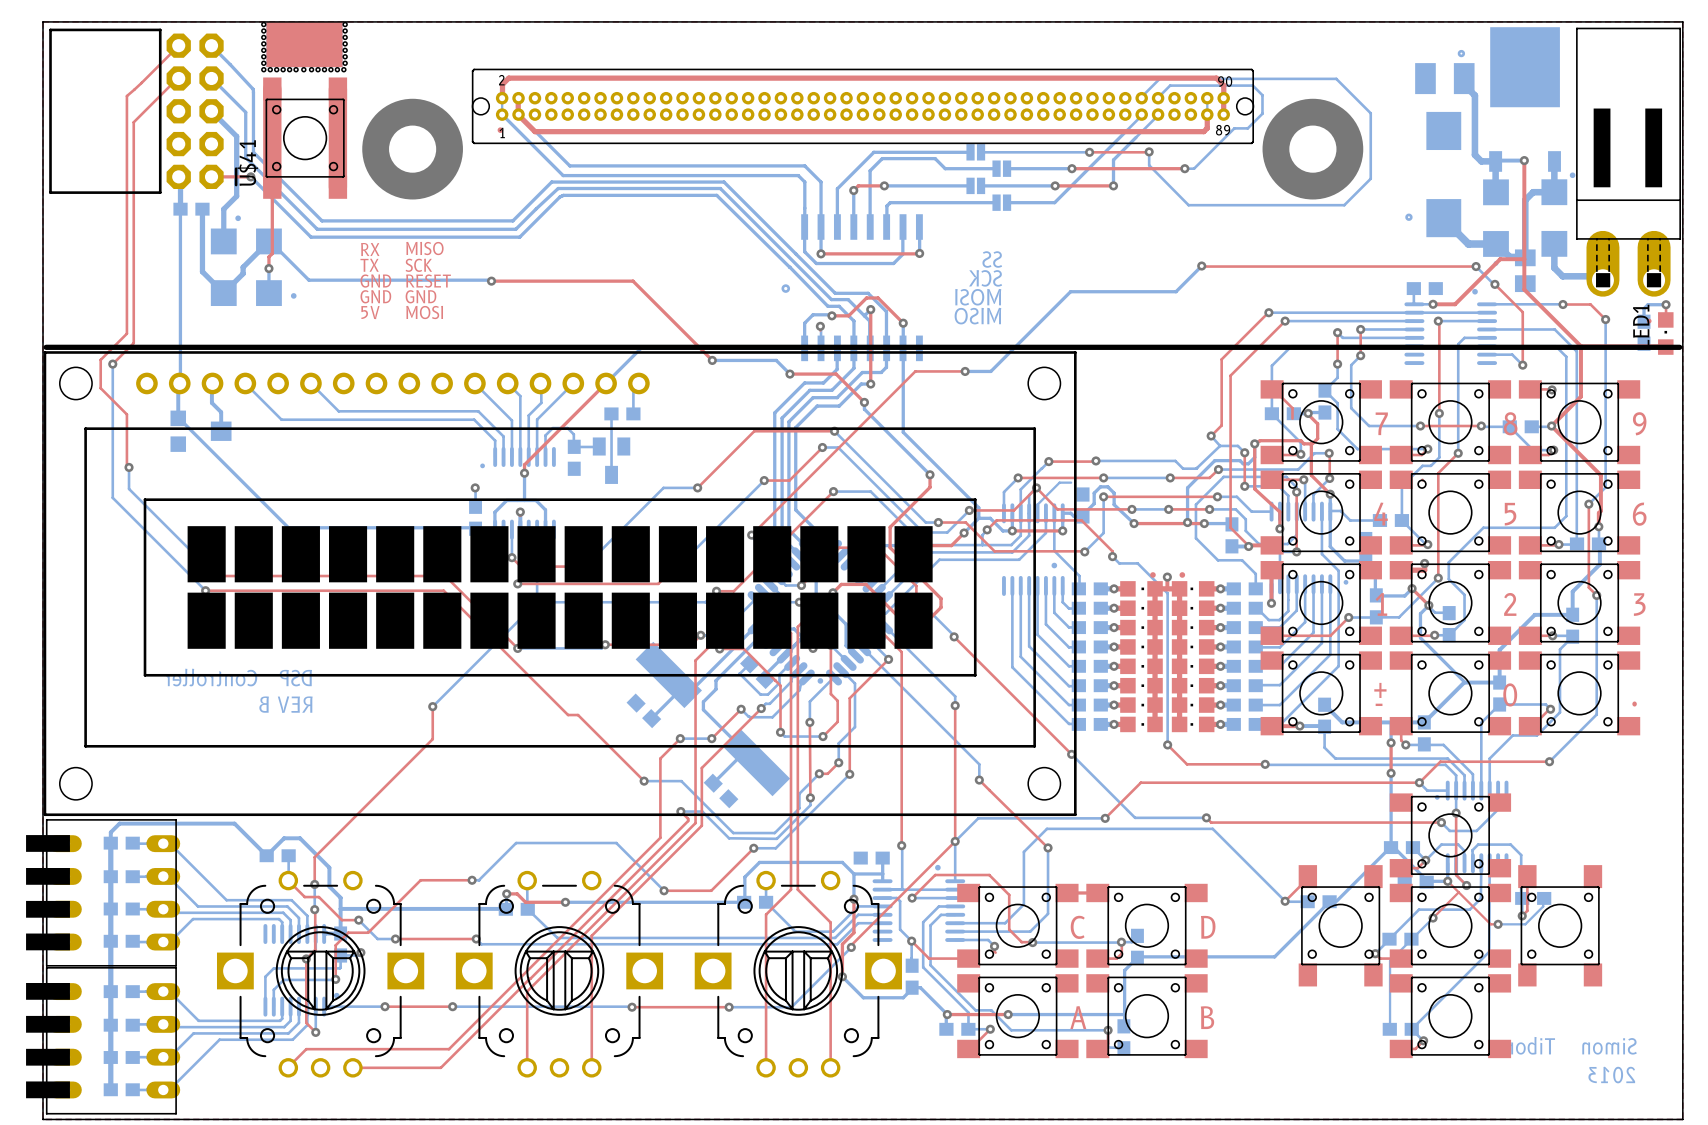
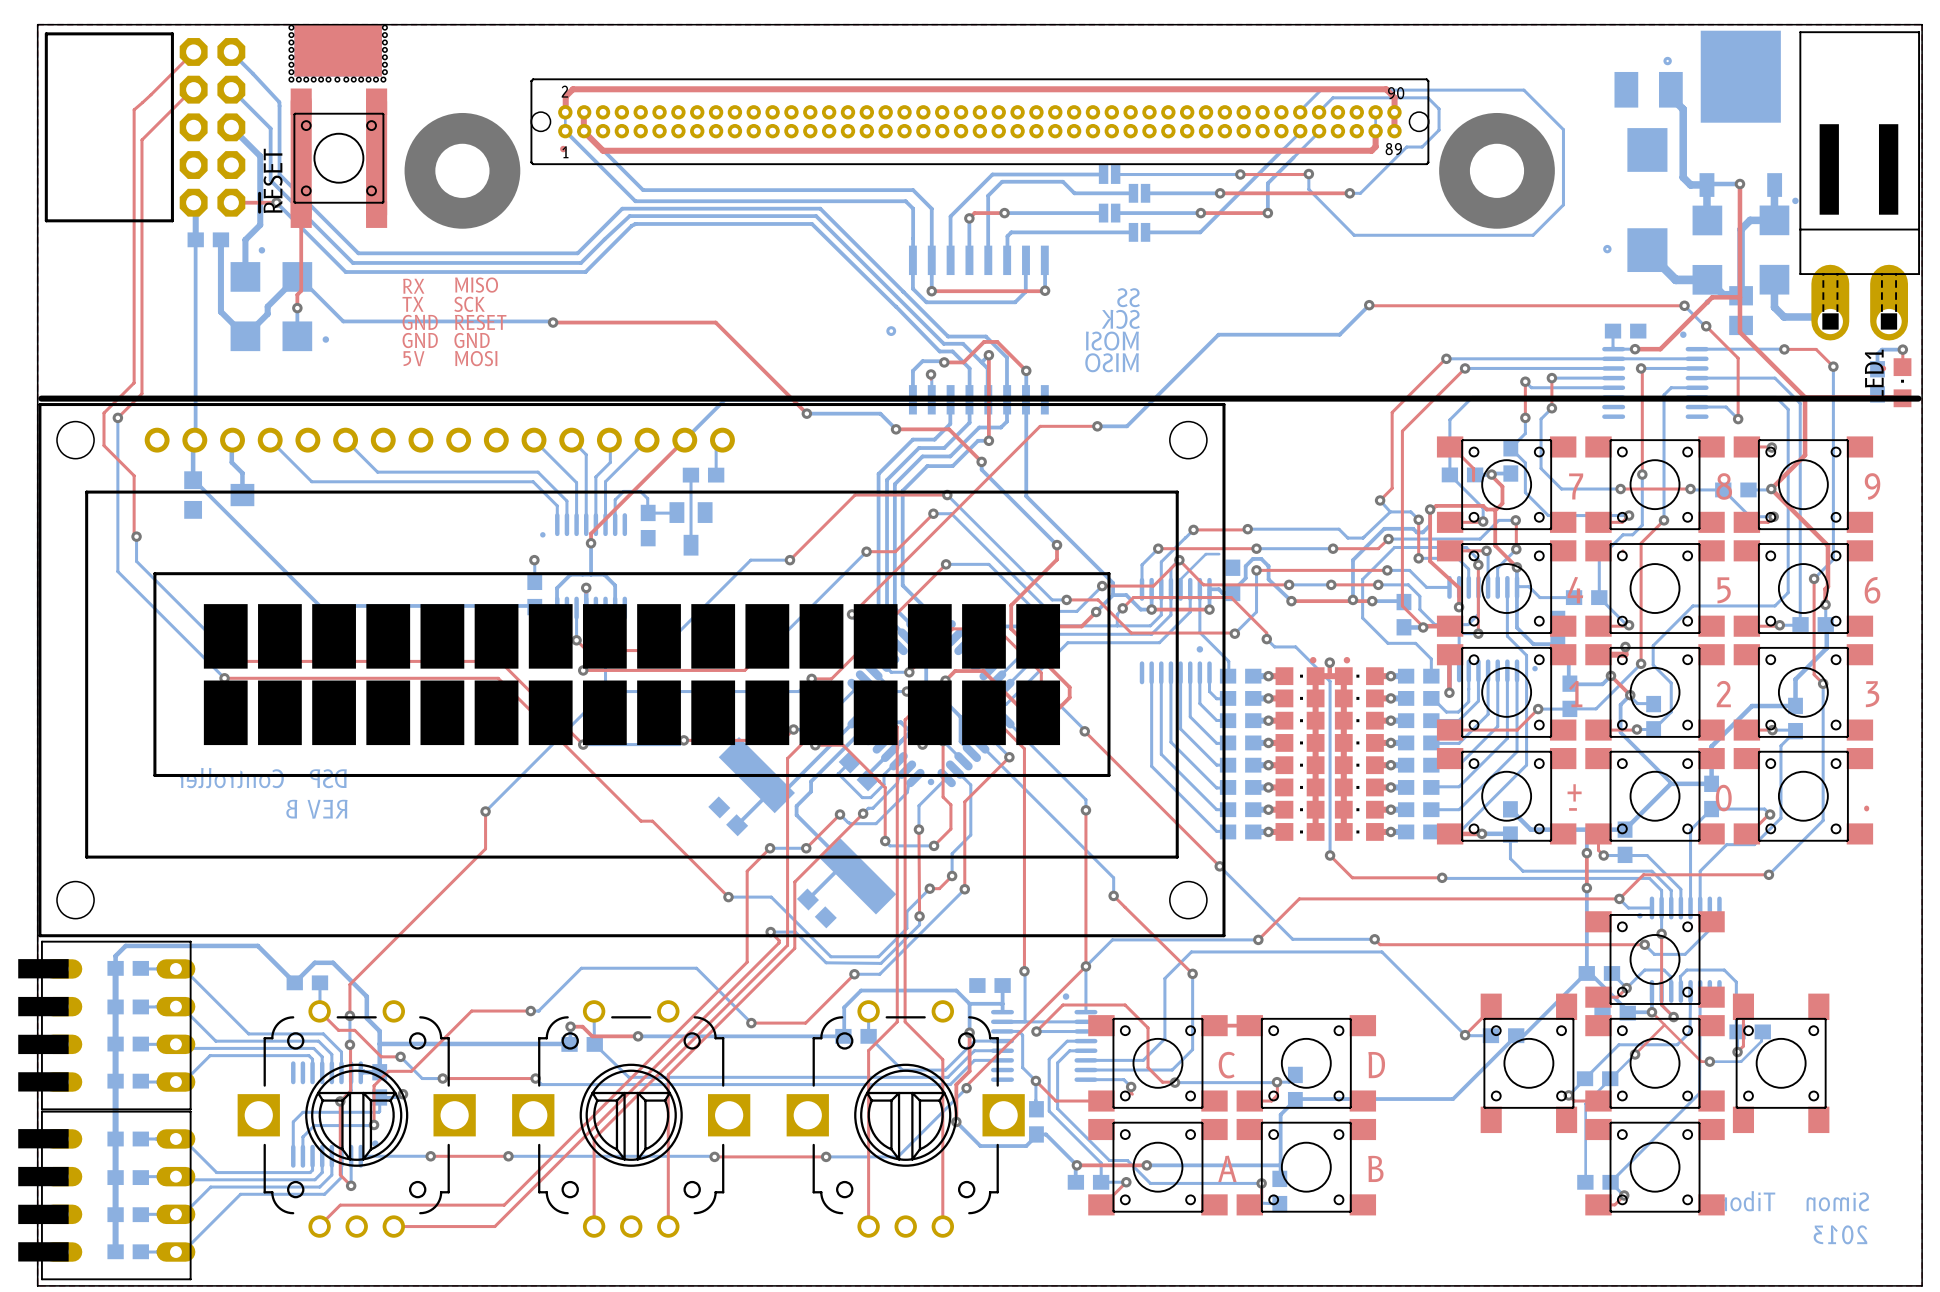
U$41 name: U$41 (247, 163) -> RESET (273, 180)

